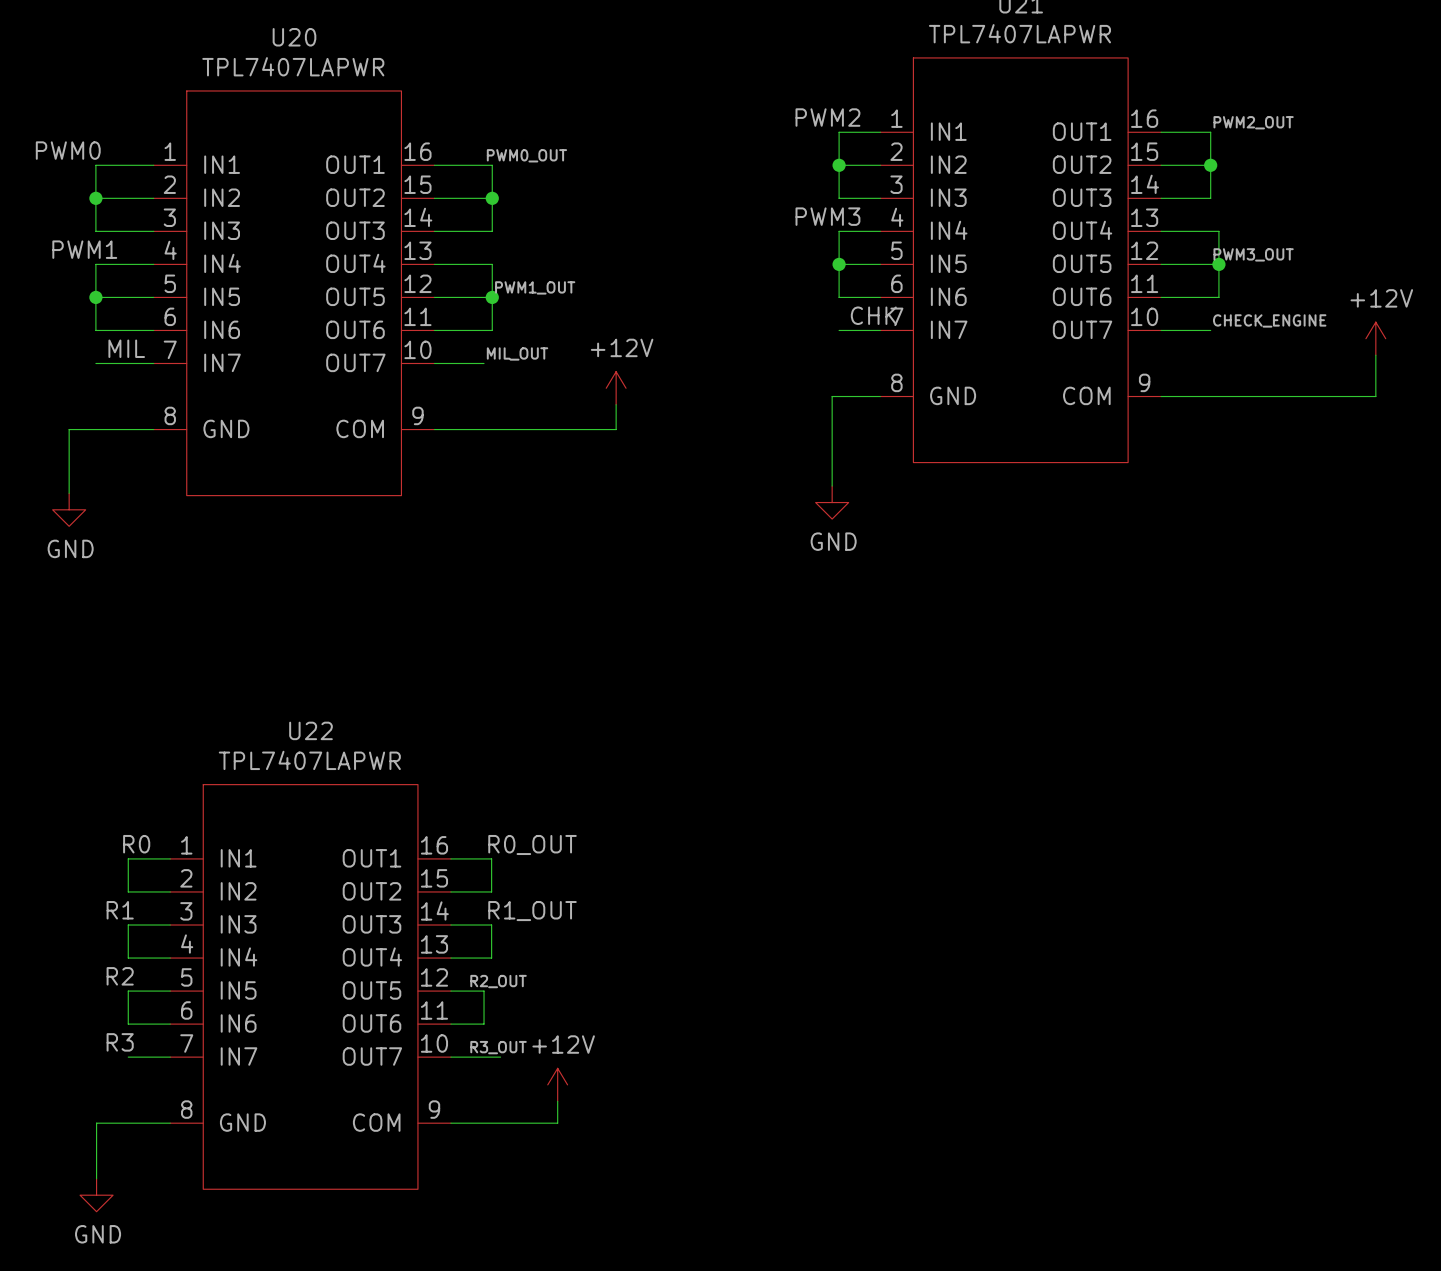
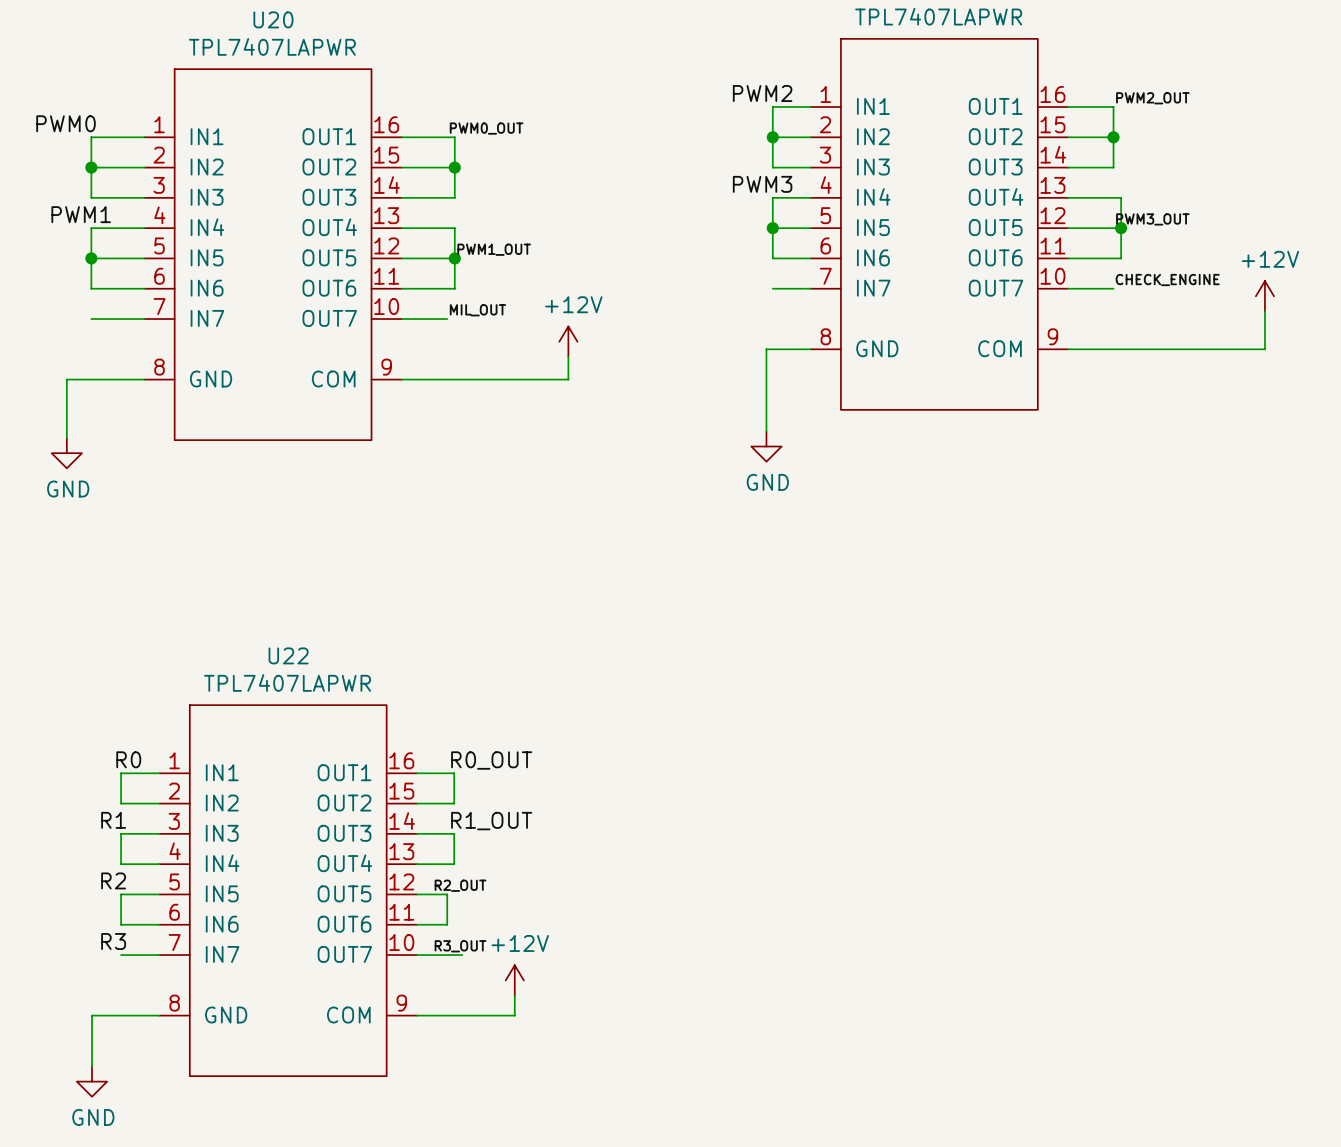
label: CHK (873, 315) -> none
label: MIL (126, 348) -> none

